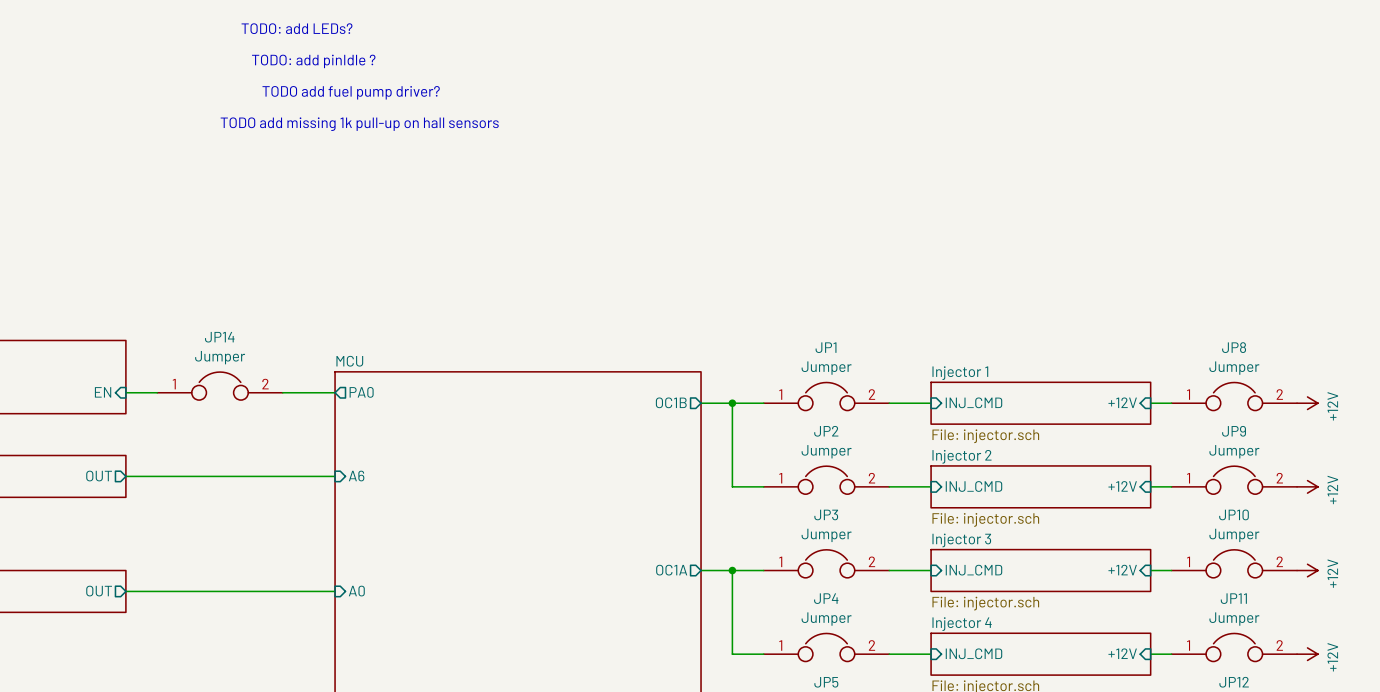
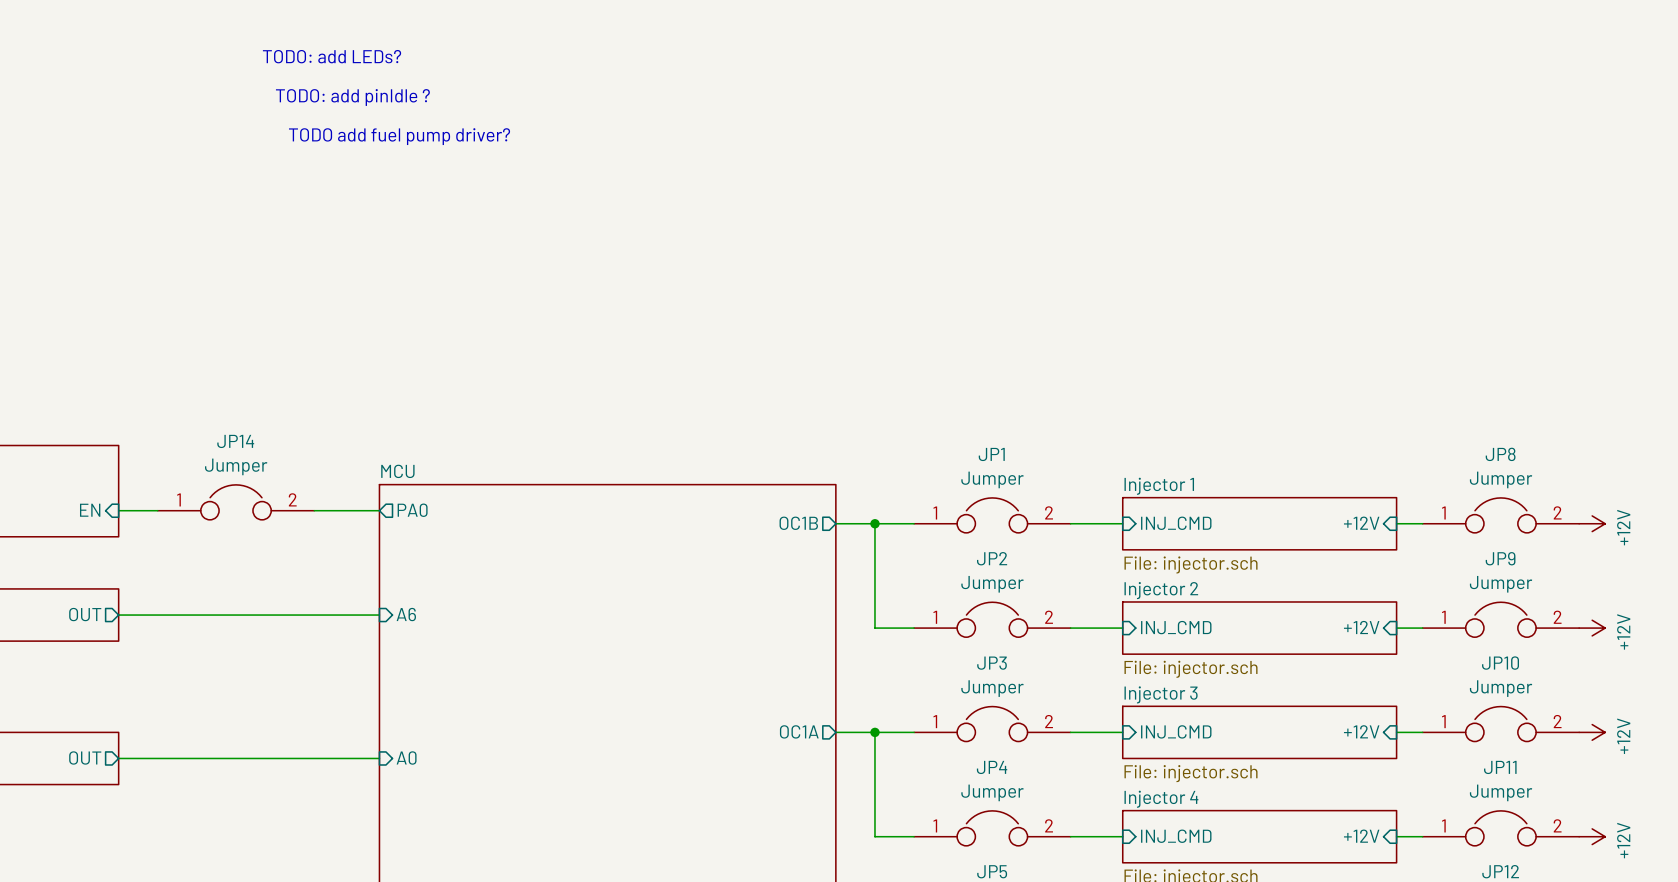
text: TODO add missing 1k pull-up on hall sensors (359, 124) -> none

